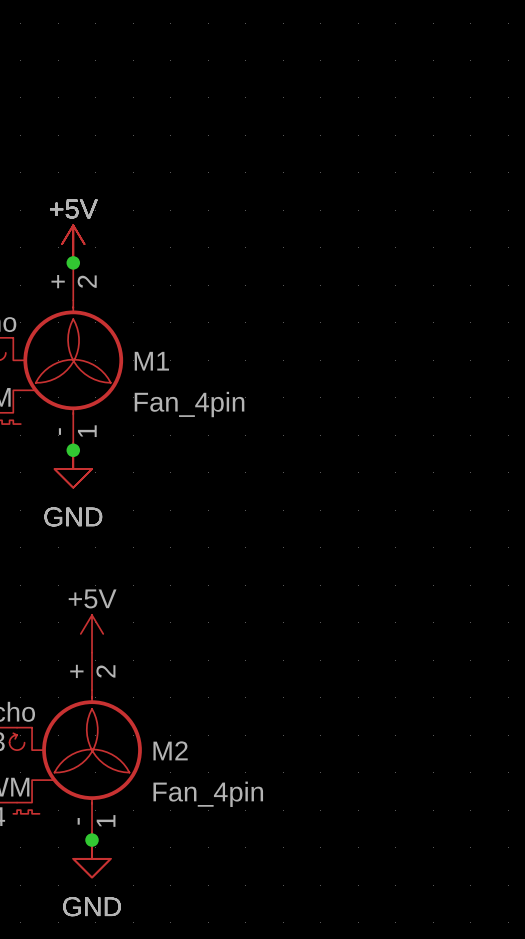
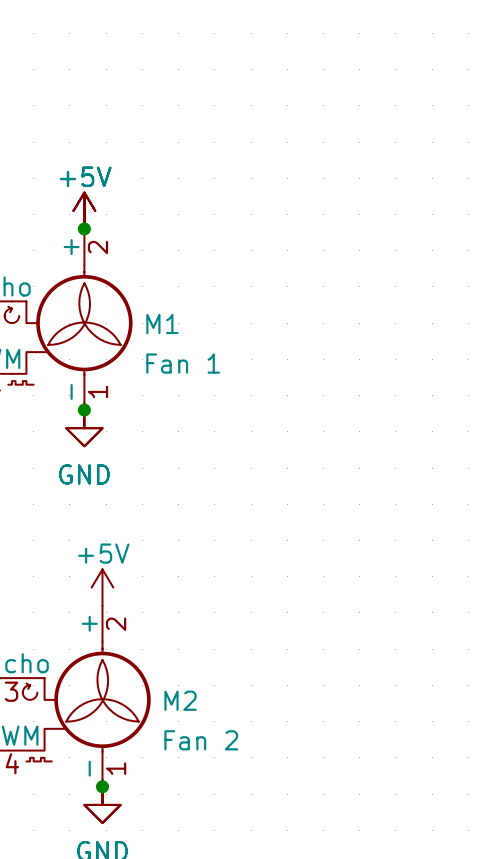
M1 value: Fan_4pin (189, 404) -> Fan 1 (183, 363)
M2 value: Fan_4pin (208, 794) -> Fan 2 (201, 740)

